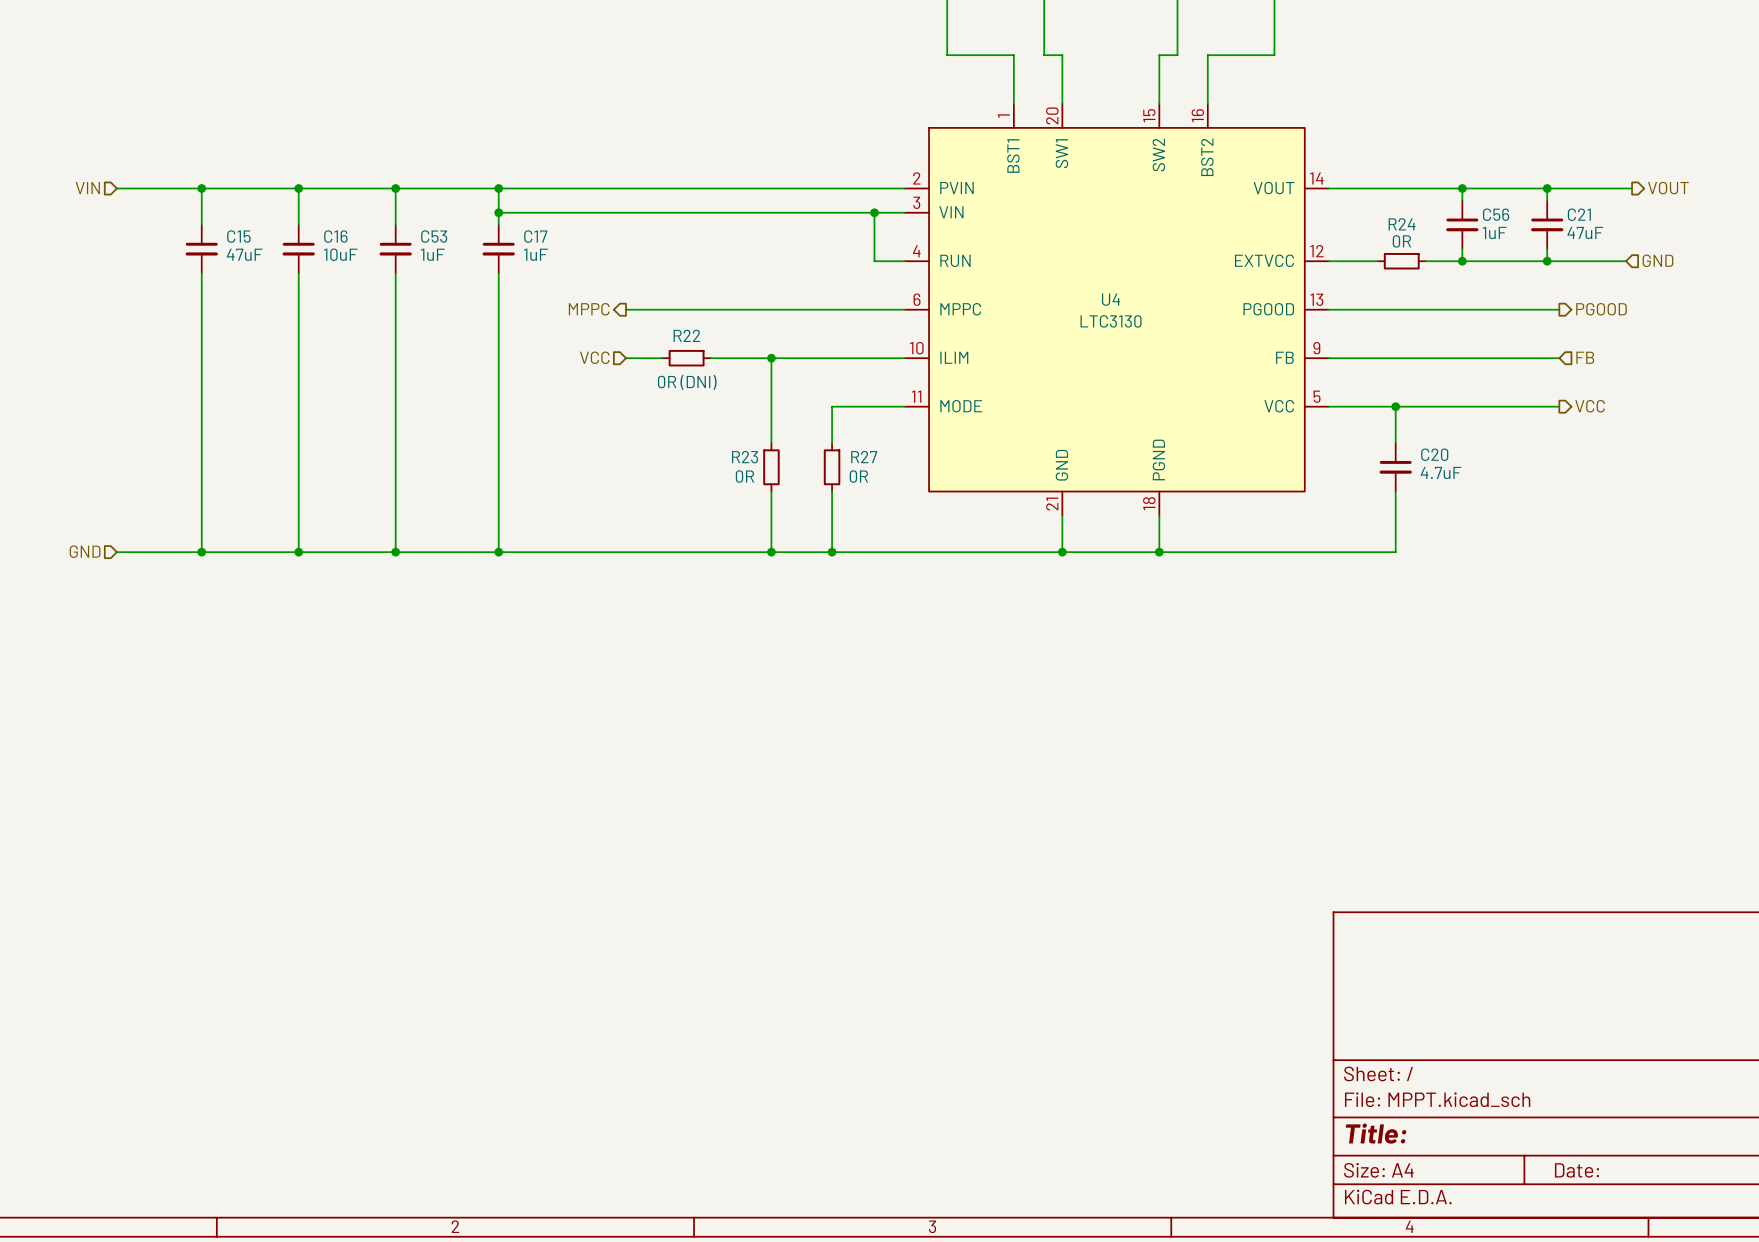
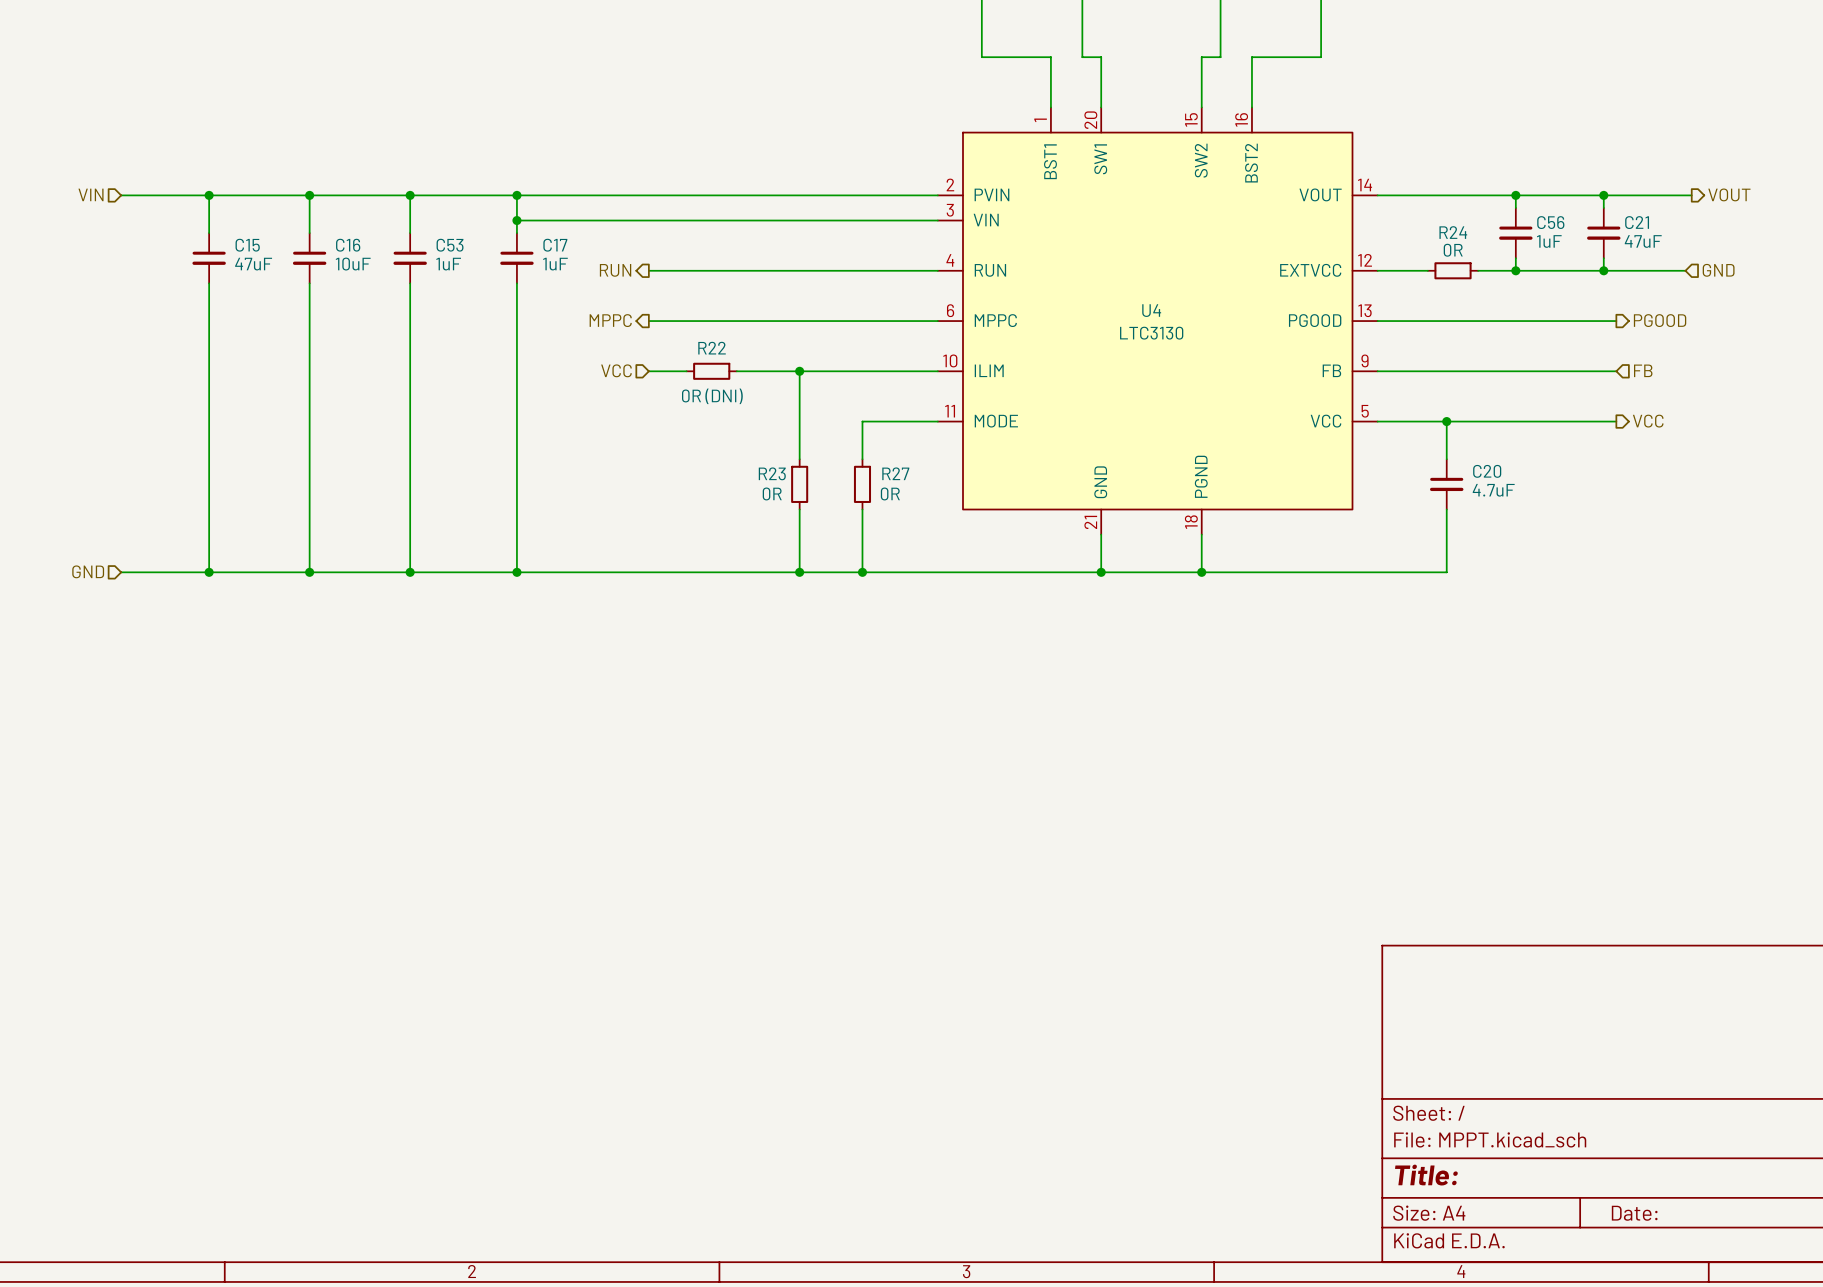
wire: (874, 212) (874, 261) -> (648, 270) (906, 270)
junction: (874, 212) -> none
hierarchical label: none -> RUN (615, 270)

